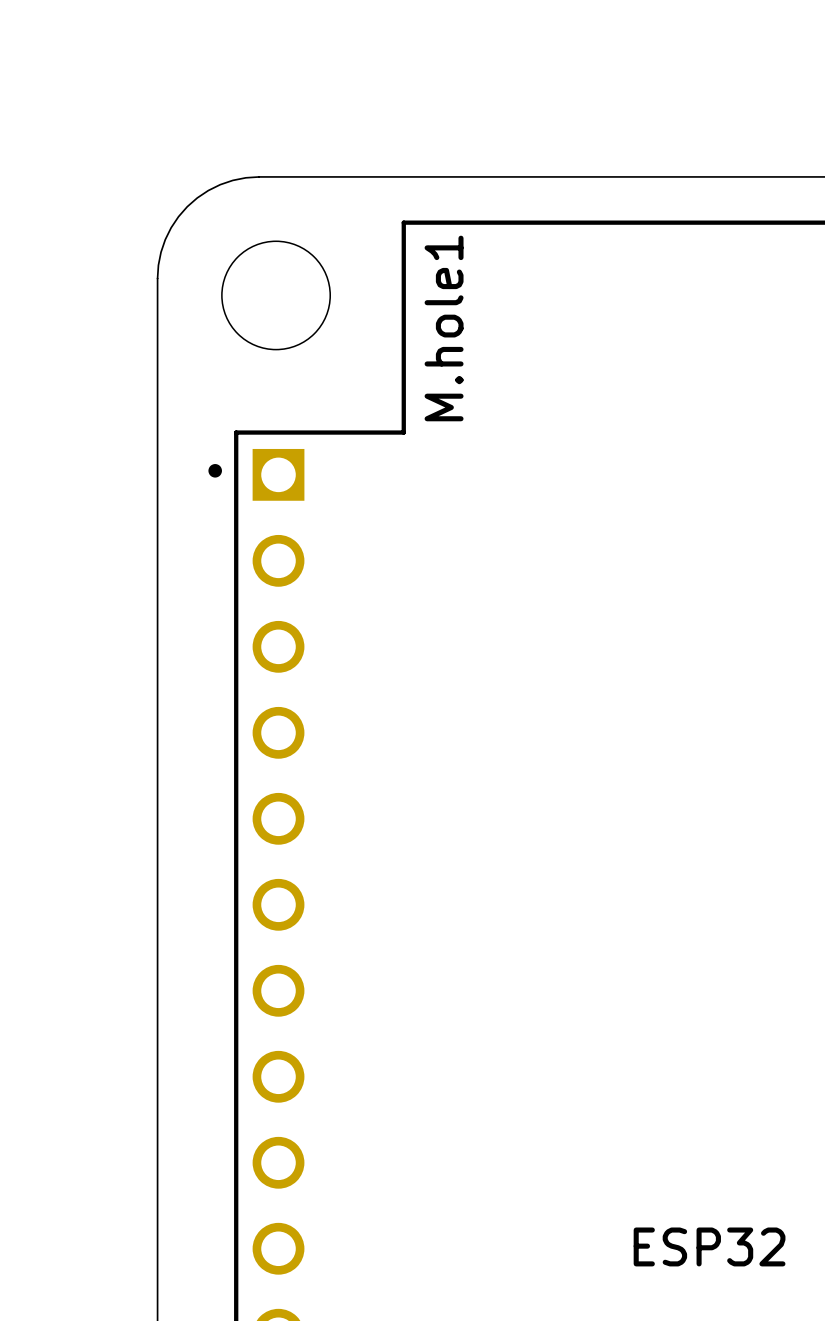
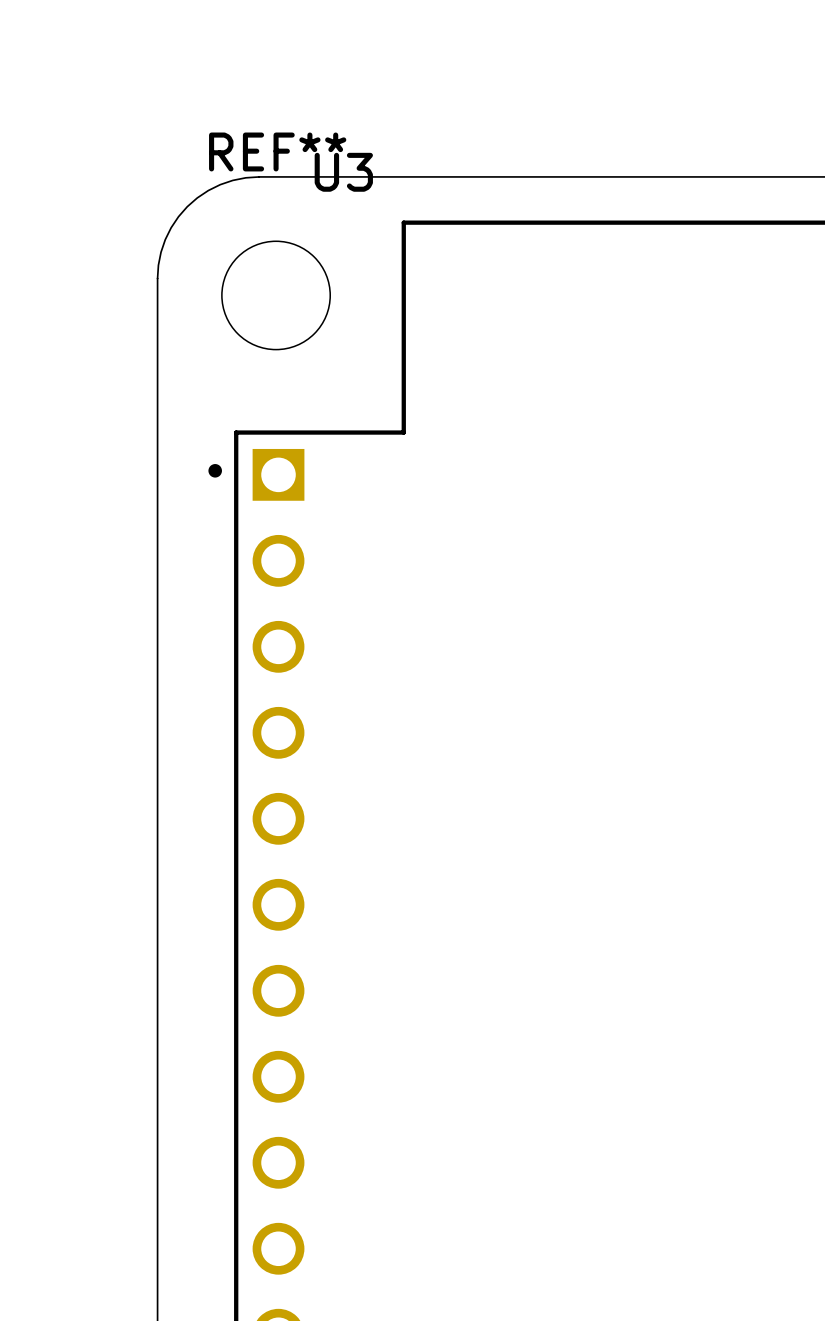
M.hole1 name: M.hole1 (444, 328) -> REF** (277, 151)
ESP32 name: ESP32 (709, 1246) -> U3 (343, 172)

